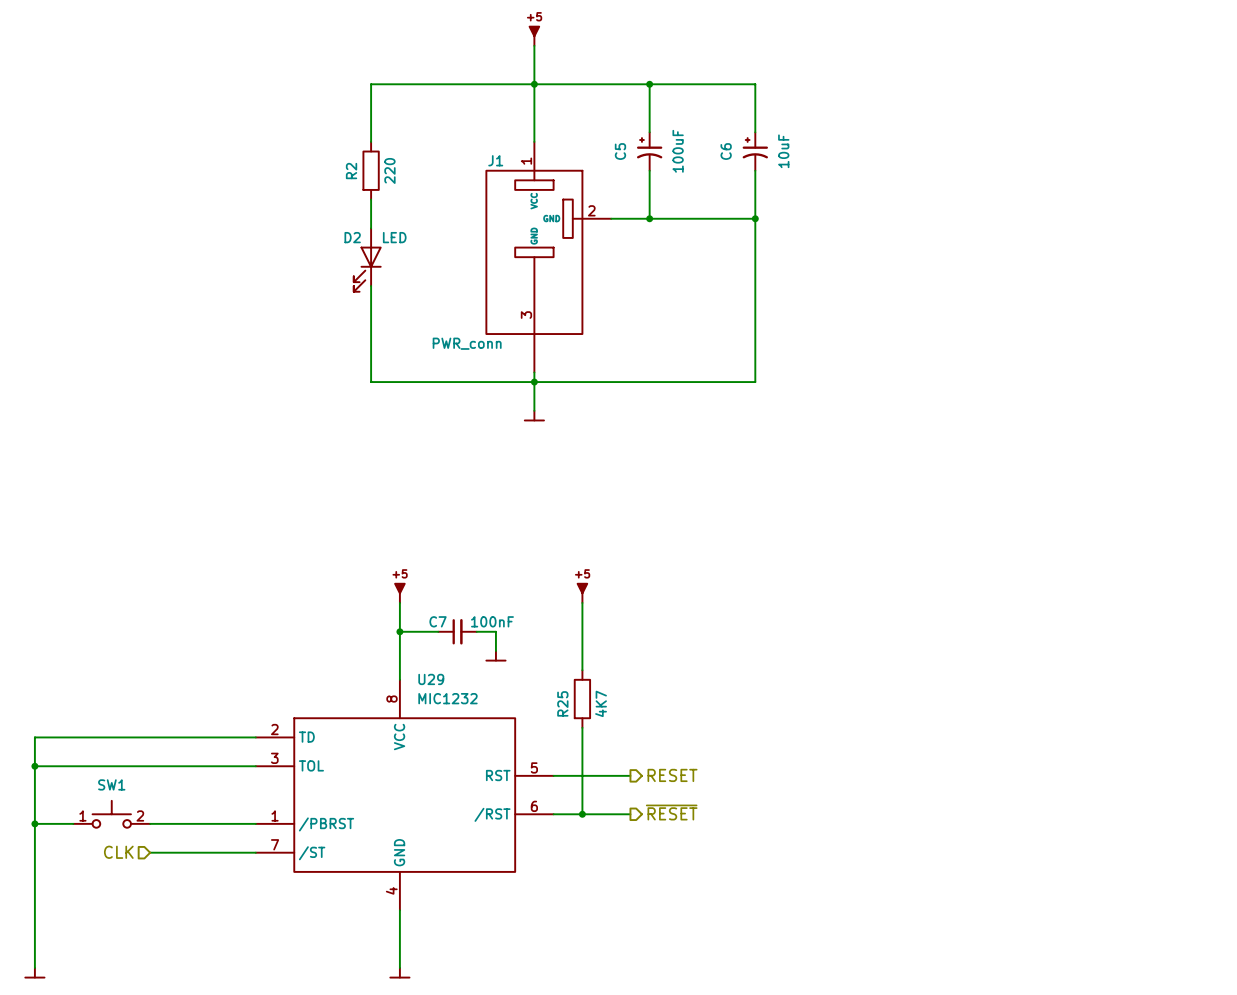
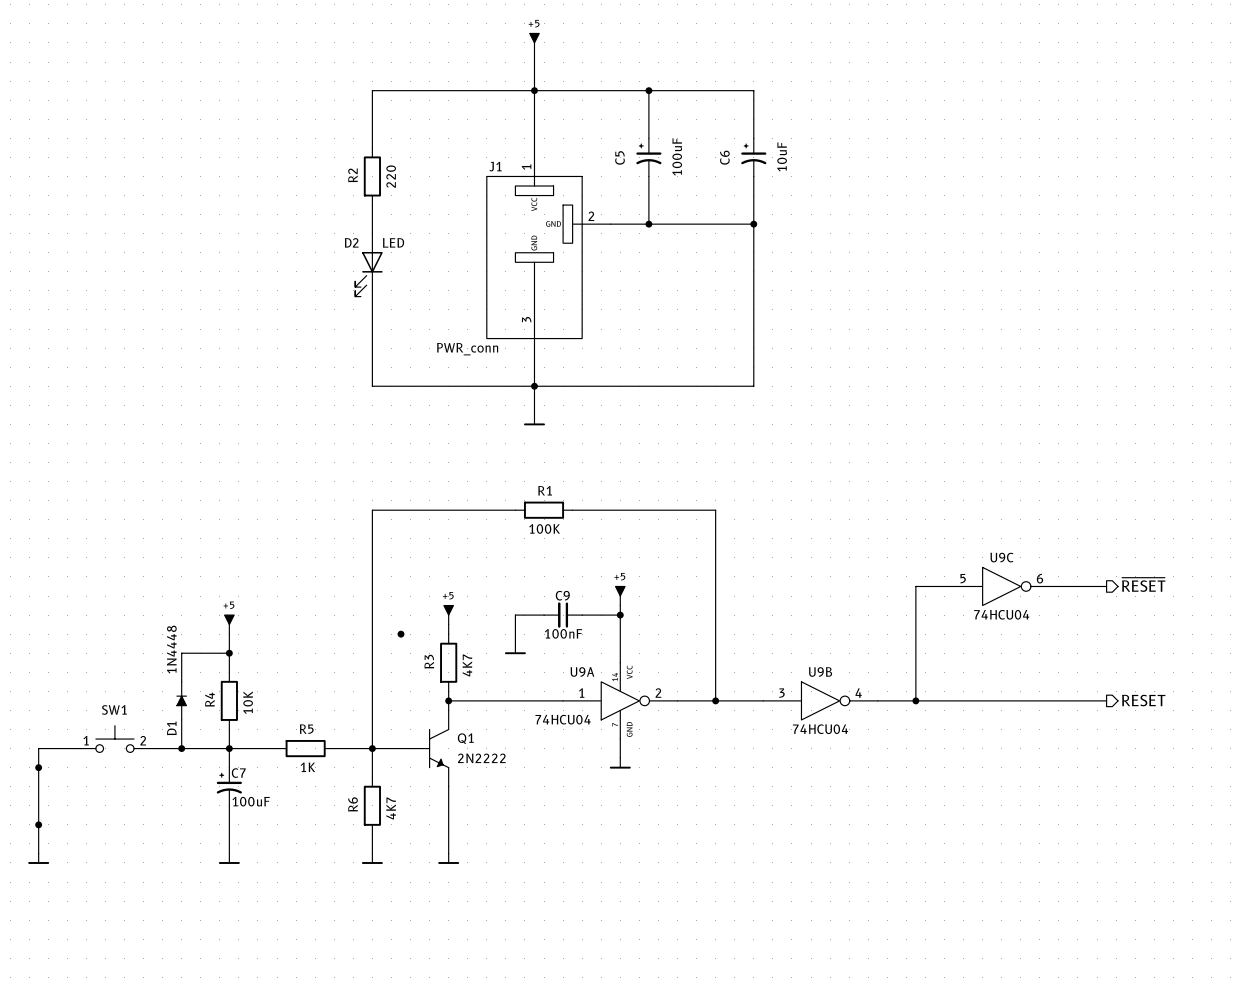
wire: none -> (515, 510) (372, 510) (372, 777)
R1: none -> 100K (544, 510)
wire: none -> (572, 510) (715, 510) (715, 700)
hierarchical label: none -> ~{RESET} (1143, 584)
wire: none -> (944, 586) (915, 586) (915, 700)
U9C: none -> 74HCU04 (1001, 586)
wire: none -> (1058, 586) (1106, 586)
power symbol position: (399, 593) -> (448, 615)
power symbol position: (582, 593) -> (620, 596)
wire: (399, 602) (399, 679) -> none
wire: (582, 602) (582, 670) -> none
wire: none -> (620, 605) (620, 662)
wire: none -> (544, 615) (515, 615) (515, 643)
C9: none -> 100nF (563, 615)
junction: none -> (620, 615)
C7 symbol: [438, 619, 477, 645] -> [216, 767, 242, 806]
C7 name position: C7 (438, 621) -> C7 (238, 773)
C7 value: 100nF (492, 621) -> 100uF (251, 801)
power symbol: none -> (229, 624)
wire: none -> (448, 624) (448, 634)
wire: none -> (229, 634) (229, 672)
wire: (399, 631) (438, 631) -> (582, 615) (620, 615)
wire: (476, 631) (495, 631) (495, 650) -> none
wire: none -> (229, 653) (181, 653) (181, 681)
junction: none -> (229, 653)
power symbol position: (495, 656) -> (515, 648)
R3: none -> 4K7 (448, 662)
wire: none -> (448, 691) (448, 710)
hierarchical label: none -> RESET (1143, 700)
D1: none -> 1N4448 (181, 700)
R4: none -> 10K (229, 700)
wire: none -> (448, 700) (563, 700)
junction: none -> (448, 700)
R25: 4K7 (582, 699) -> none
U9A: none -> 74HCU04 (620, 700)
wire: none -> (677, 700) (763, 700)
junction: none -> (715, 700)
U9B: none -> 74HCU04 (820, 700)
wire: none -> (877, 700) (1106, 700)
junction: none -> (915, 700)
wire: none -> (181, 719) (181, 748)
wire: none -> (229, 729) (229, 767)
wire: (582, 727) (582, 814) -> none
wire: (255, 737) (34, 737) (34, 747) -> (76, 748) (38, 748)
wire: none -> (620, 739) (620, 758)
wire: none -> (153, 748) (277, 748)
junction: none -> (181, 748)
junction: none -> (229, 748)
R5: none -> 1K (305, 748)
wire: none -> (334, 748) (410, 748)
junction: none -> (372, 748)
Q1: none -> 2N2222 (429, 748)
power symbol: none -> (620, 763)
wire: (34, 766) (255, 766) -> none
wire: (553, 775) (630, 775) -> none
hierarchical label: RESET (672, 775) -> none
wire: none -> (448, 786) (448, 853)
U29: MIC1232 (404, 795) -> none
wire: none -> (229, 805) (229, 853)
R6: none -> 4K7 (372, 805)
hierarchical label: ~{RESET} (671, 812) -> none
SW1 position: (111, 814) -> (114, 739)
wire: (553, 814) (630, 814) -> none
junction: (582, 814) -> none
wire: (34, 823) (73, 823) -> none
wire: (150, 823) (255, 823) -> none
wire: none -> (372, 834) (372, 853)
wire: (34, 852) (34, 967) -> none
hierarchical label: CLK (118, 852) -> none
wire: (150, 852) (255, 852) -> none
power symbol: none -> (38, 858)
power symbol: none -> (229, 858)
power symbol: none -> (372, 858)
power symbol: none -> (448, 858)
wire: (399, 910) (399, 967) -> none
power symbol: (34, 973) -> none
power symbol: (399, 973) -> none

